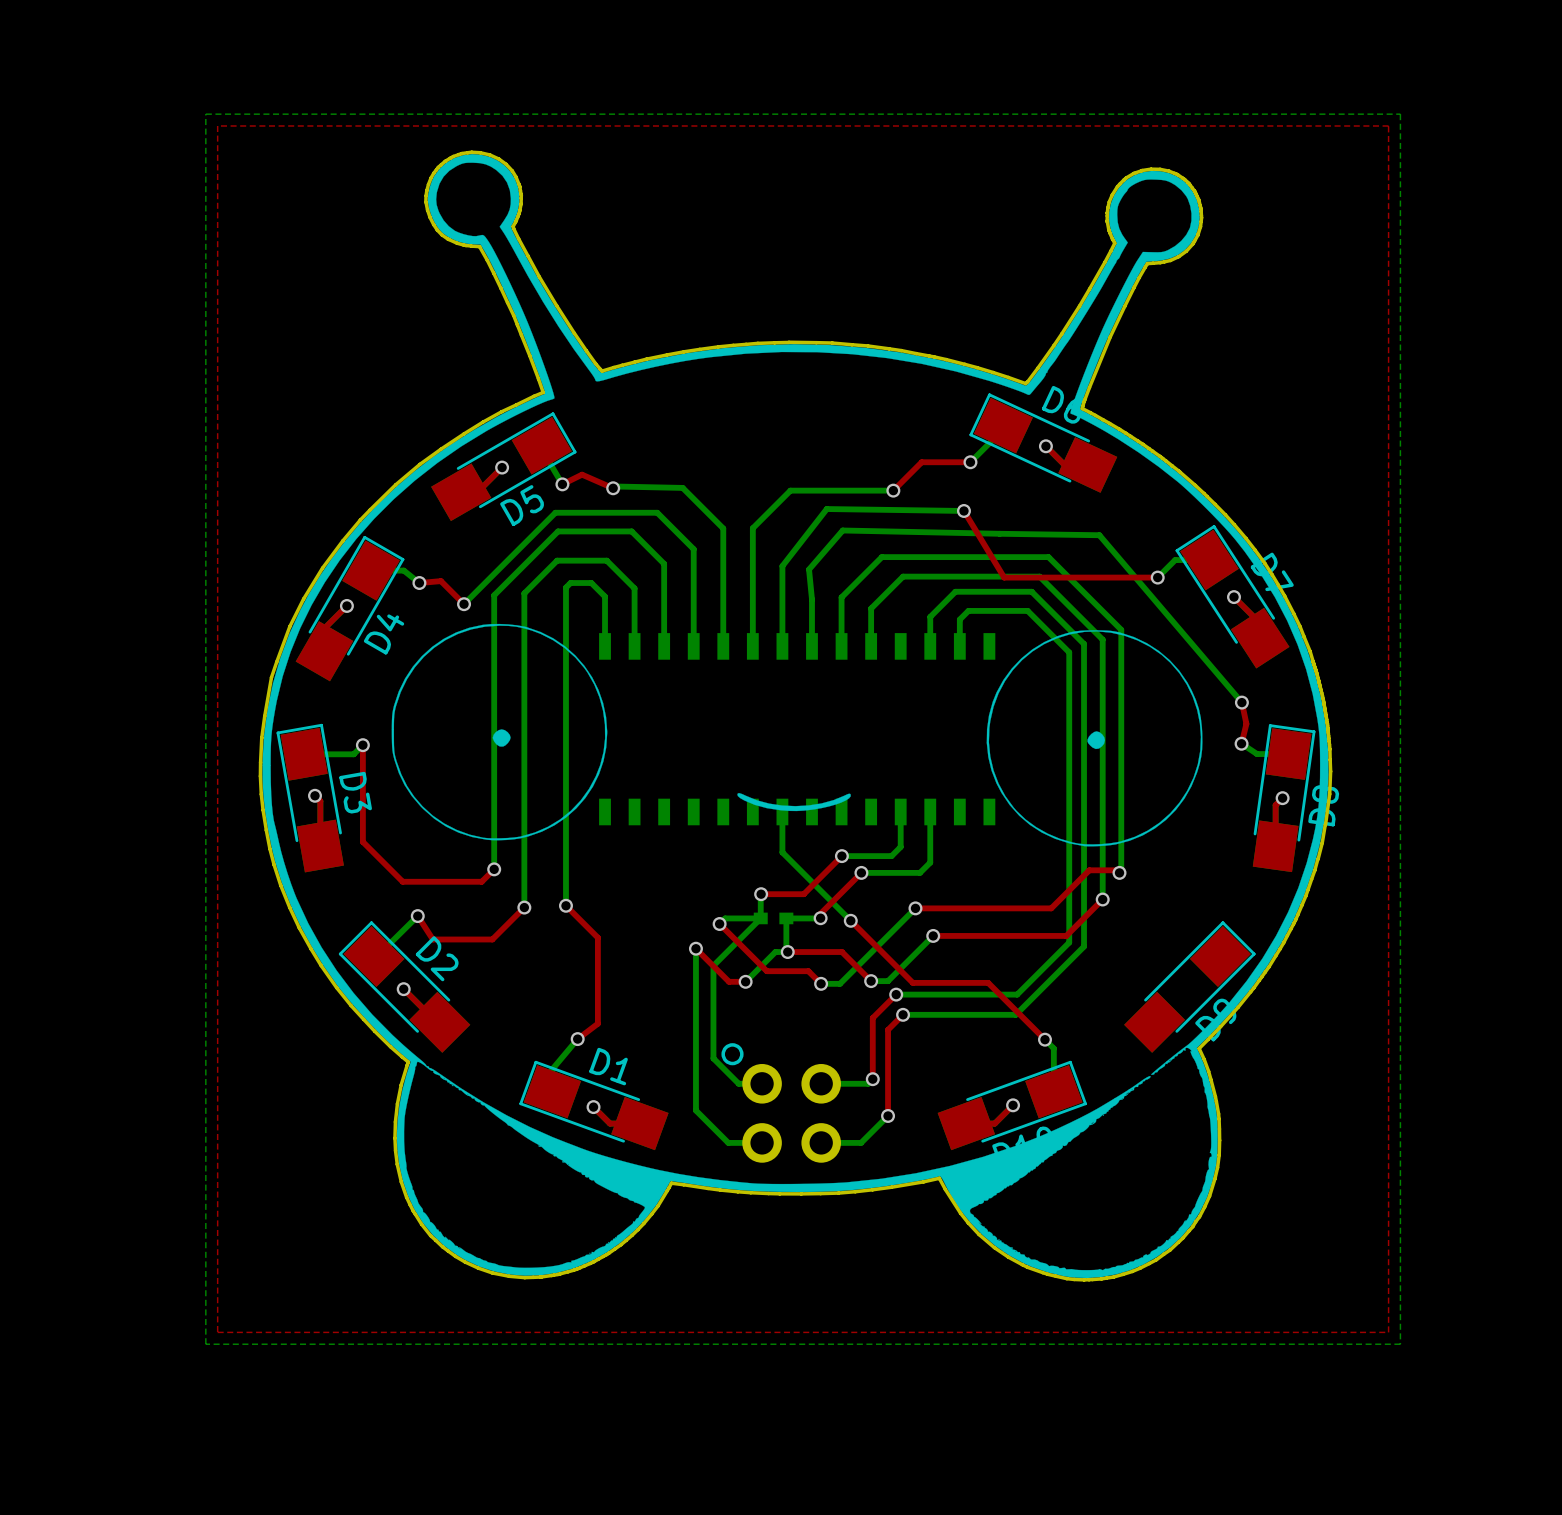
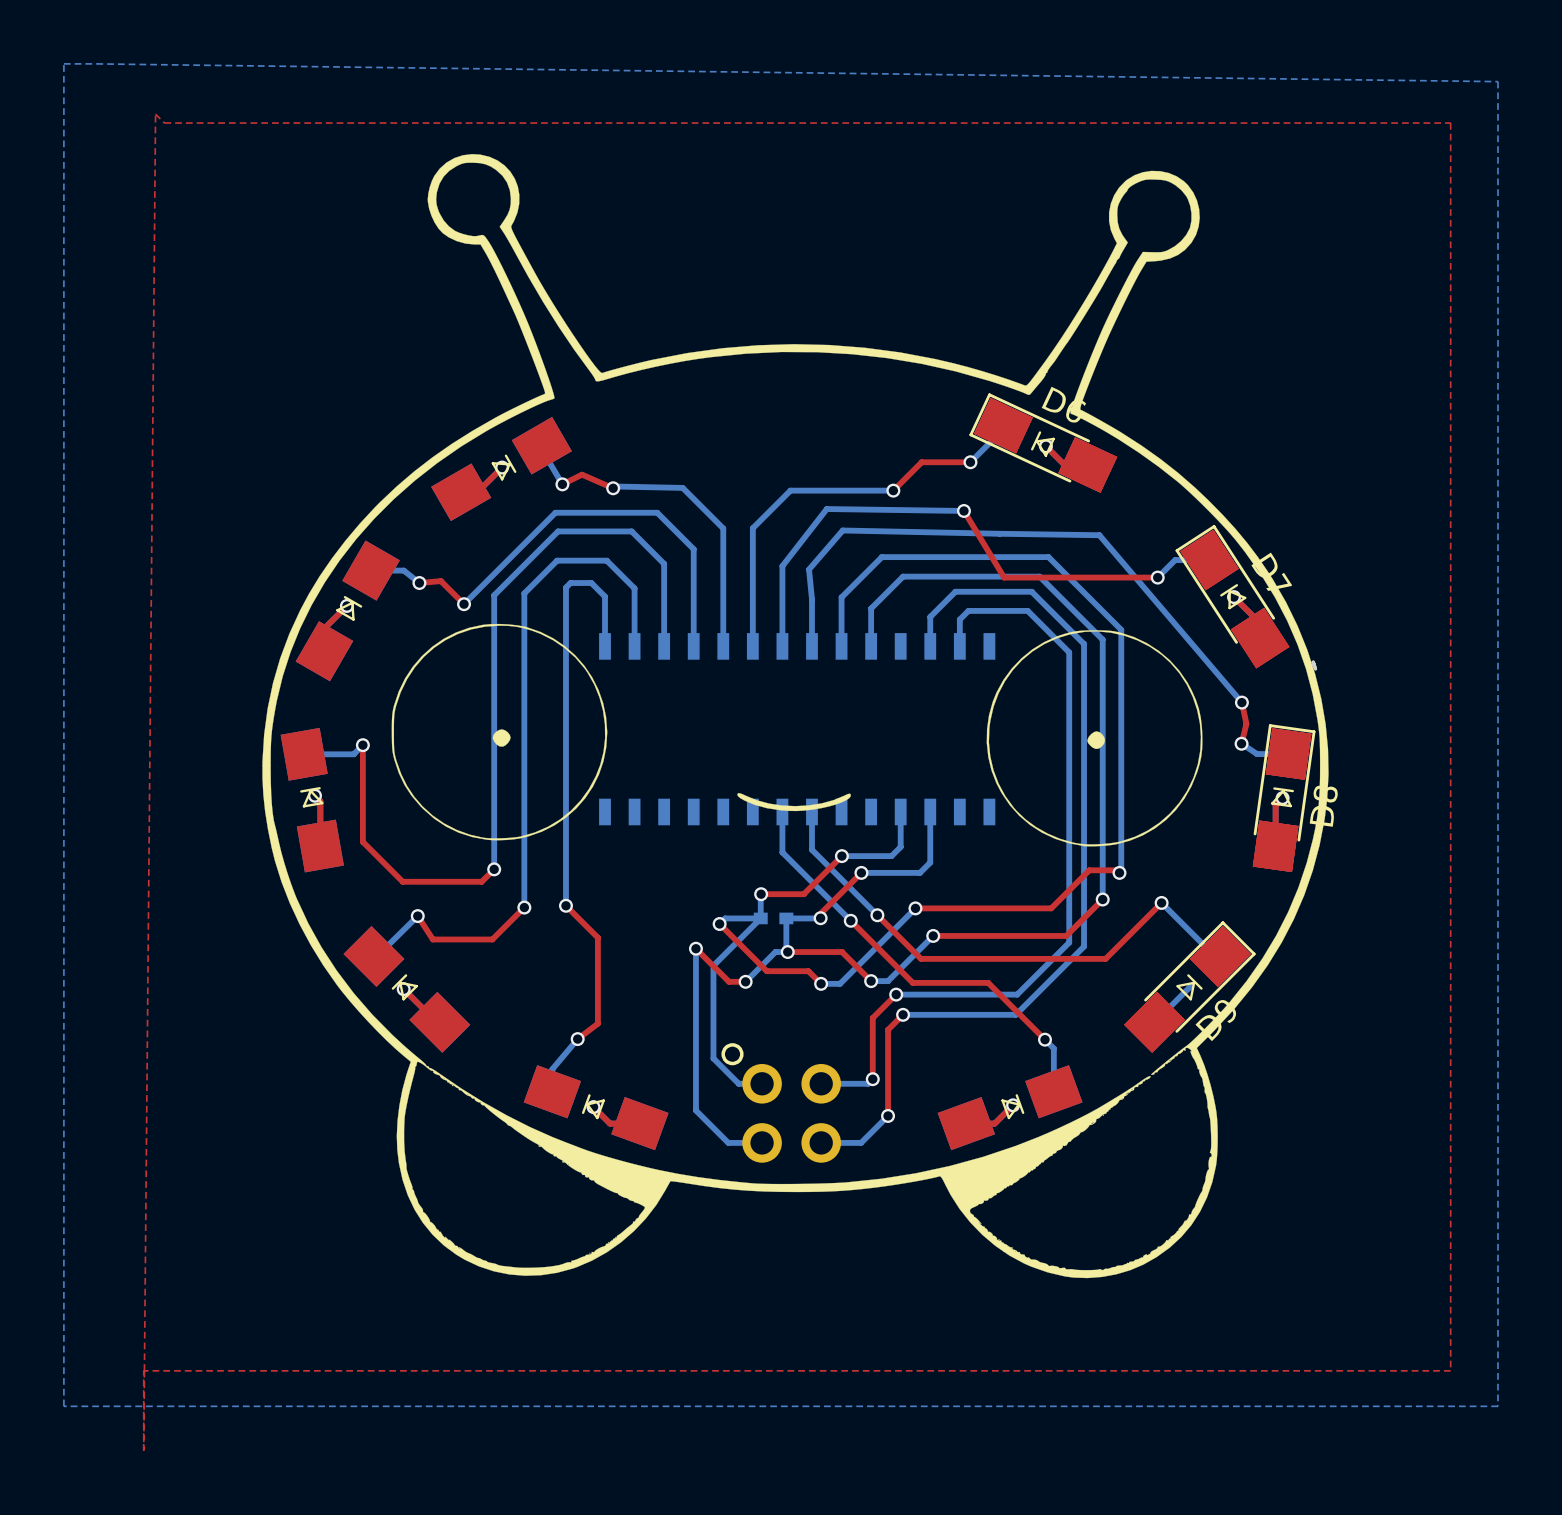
bottom zone outline: (205, 114) (205, 1344) (1400, 1344) (1400, 114) (205, 114) -> (63, 63) (63, 1406) (1497, 1406) (1497, 81) (63, 63)
top zone outline: (217, 125) (217, 1332) (1388, 1332) (1388, 125) (217, 125) -> (155, 114) (143, 1450) (143, 1370) (1450, 1370) (1450, 123) (164, 123) (155, 114)
board edge: (1151, 169) (1133, 173) -> none
board edge: (1151, 169) (1169, 171) (1177, 174) (1189, 183) (1198, 199) -> none
board edge: (1133, 173) (1124, 179) (1112, 194) (1107, 207) (1107, 221) -> none
board edge: (426, 195) (431, 177) (445, 161) (461, 153) (480, 152) (499, 159) (512, 170) (519, 186) (521, 195) (519, 210) -> none
board edge: (426, 195) (425, 202) -> none
board edge: (1198, 199) (1201, 217) (1198, 234) -> none
board edge: (426, 202) (430, 217) (441, 234) (457, 243) (479, 246) (513, 315) (543, 392) (483, 422) (419, 464) (395, 484) (360, 520) (322, 568) (289, 626) (271, 677) (261, 737) (260, 776) (263, 810) (269, 848) (280, 885) (299, 927) (321, 965) (351, 1005) (374, 1031) (408, 1062) (401, 1084) (395, 1121) (397, 1164) (401, 1182) (413, 1211) (430, 1235) (448, 1251) (465, 1262) (492, 1272) (524, 1277) (553, 1275) (573, 1270) (592, 1262) (620, 1244) (651, 1214) (671, 1183) (750, 1192) (820, 1193) (872, 1189) (939, 1178) (960, 1213) (979, 1234) (1008, 1257) (1027, 1267) (1066, 1278) (1084, 1279) (1113, 1276) (1140, 1268) (1156, 1259) (1182, 1238) (1199, 1216) (1209, 1196) (1219, 1154) (1219, 1118) (1208, 1071) (1199, 1048) (1238, 1007) (1268, 966) (1295, 919) (1317, 858) -> none
board edge: (519, 210) (513, 226) (518, 238) (556, 305) (602, 371) (683, 351) (733, 345) (788, 342) -> none
board edge: (1107, 222) (1114, 243) (1110, 250) (1061, 333) (1025, 383) (964, 364) (901, 350) (832, 343) (789, 342) -> none
board edge: (1198, 234) (1192, 243) (1178, 256) (1170, 260) (1147, 263) (1110, 336) (1082, 408) (1119, 429) (1160, 456) (1195, 485) (1225, 514) (1254, 549) (1278, 585) (1300, 626) (1313, 661) -> none
part: none -> (1045, 445)
D5: (503, 466) -> none
part: none -> (501, 468)
part: none -> (1234, 599)
D4: (350, 608) -> none
part: none -> (347, 610)
board edge: (1315, 669) (1323, 698) (1329, 744) -> none
board edge: (1329, 744) (1329, 794) (1325, 824) -> none
D3: (310, 798) -> none
part: none -> (312, 800)
part: none -> (1282, 800)
bottom track: none -> (811, 811) (811, 849) (877, 915)
board edge: (1325, 824) (1318, 859) -> none
bottom track: none -> (1161, 902) (1215, 956) (1220, 956)
top track: none -> (1161, 902) (1105, 958) (921, 958) (877, 915)
via: none -> (1161, 902)
via: none -> (877, 915)
bottom track: none -> (1191, 985) (1154, 1022)
D2: (404, 987) -> none
part: none -> (406, 989)
part: none -> (1187, 989)
D1: (593, 1105) -> none
part: (1012, 1105) -> none
part: none -> (596, 1107)
part: none -> (1010, 1107)

